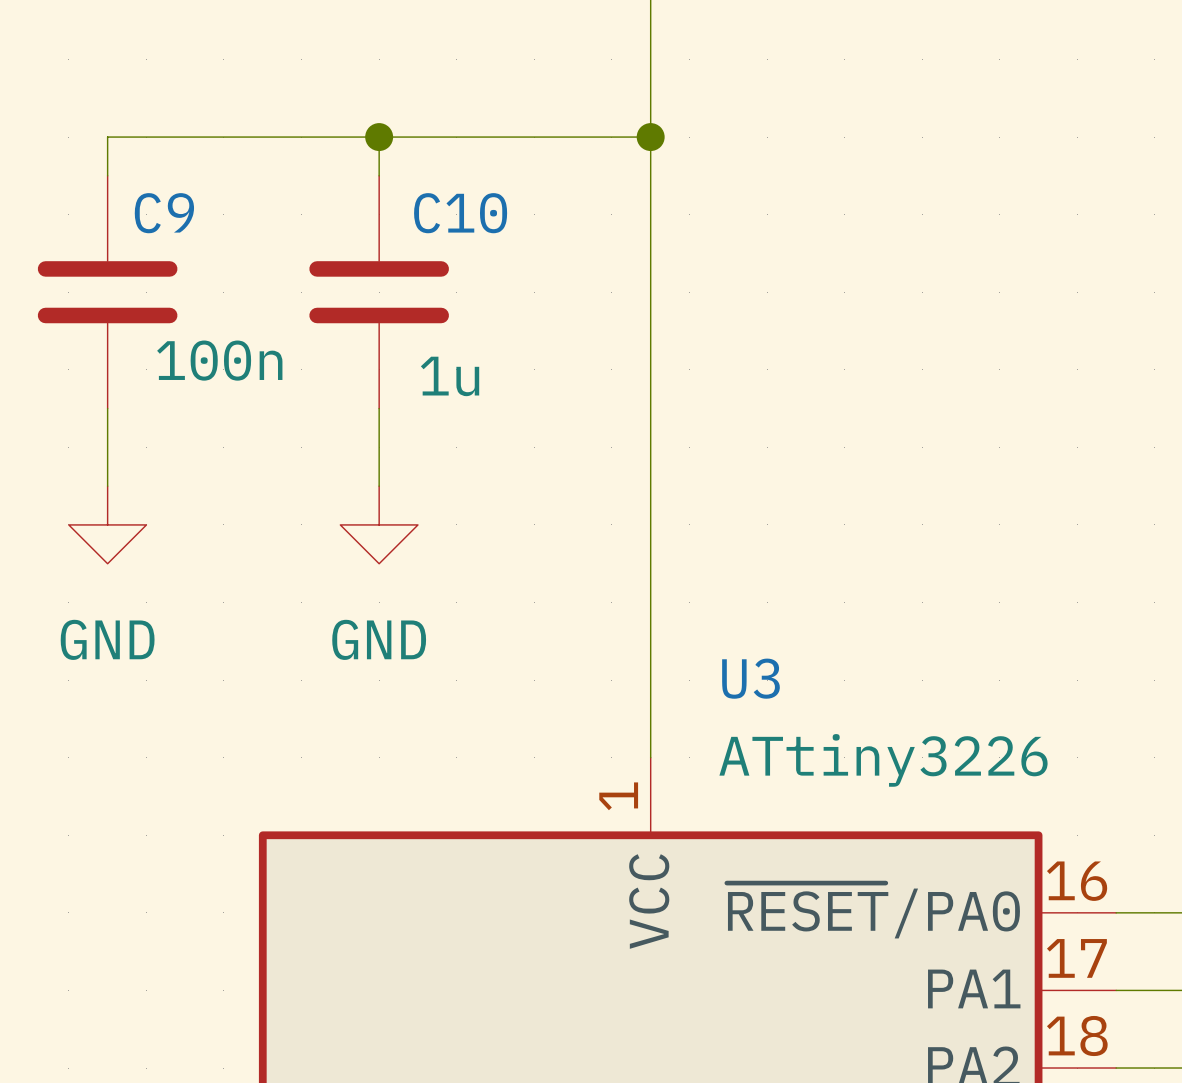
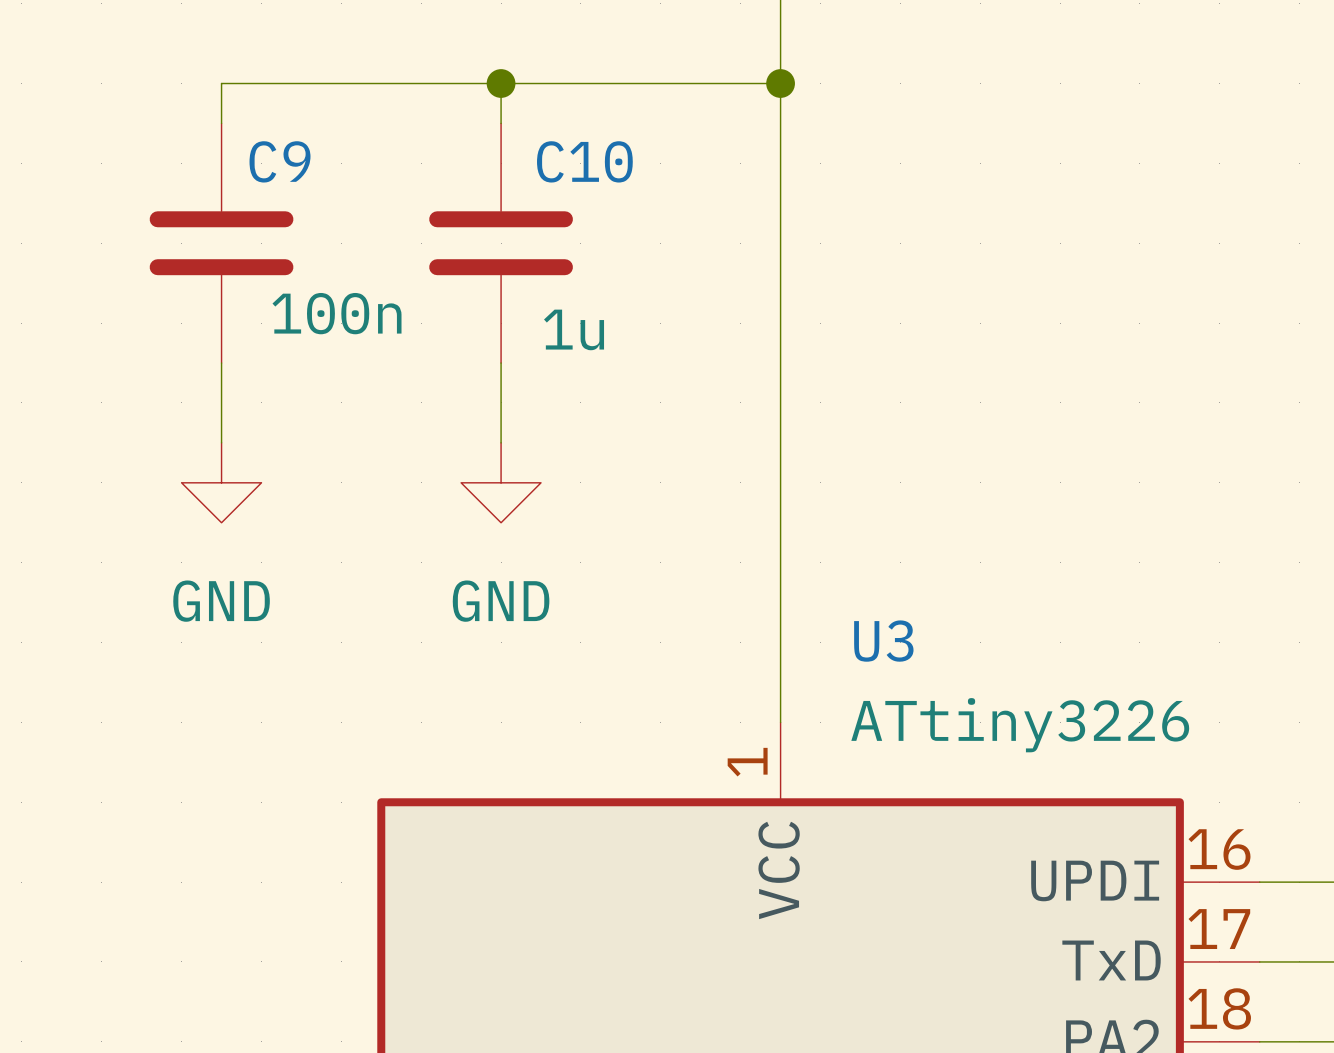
U3 pin name: ~{RESET}/PA0 (873, 910) -> UPDI (1095, 880)
U3 pin name: PA1 (974, 988) -> TxD (1111, 960)

